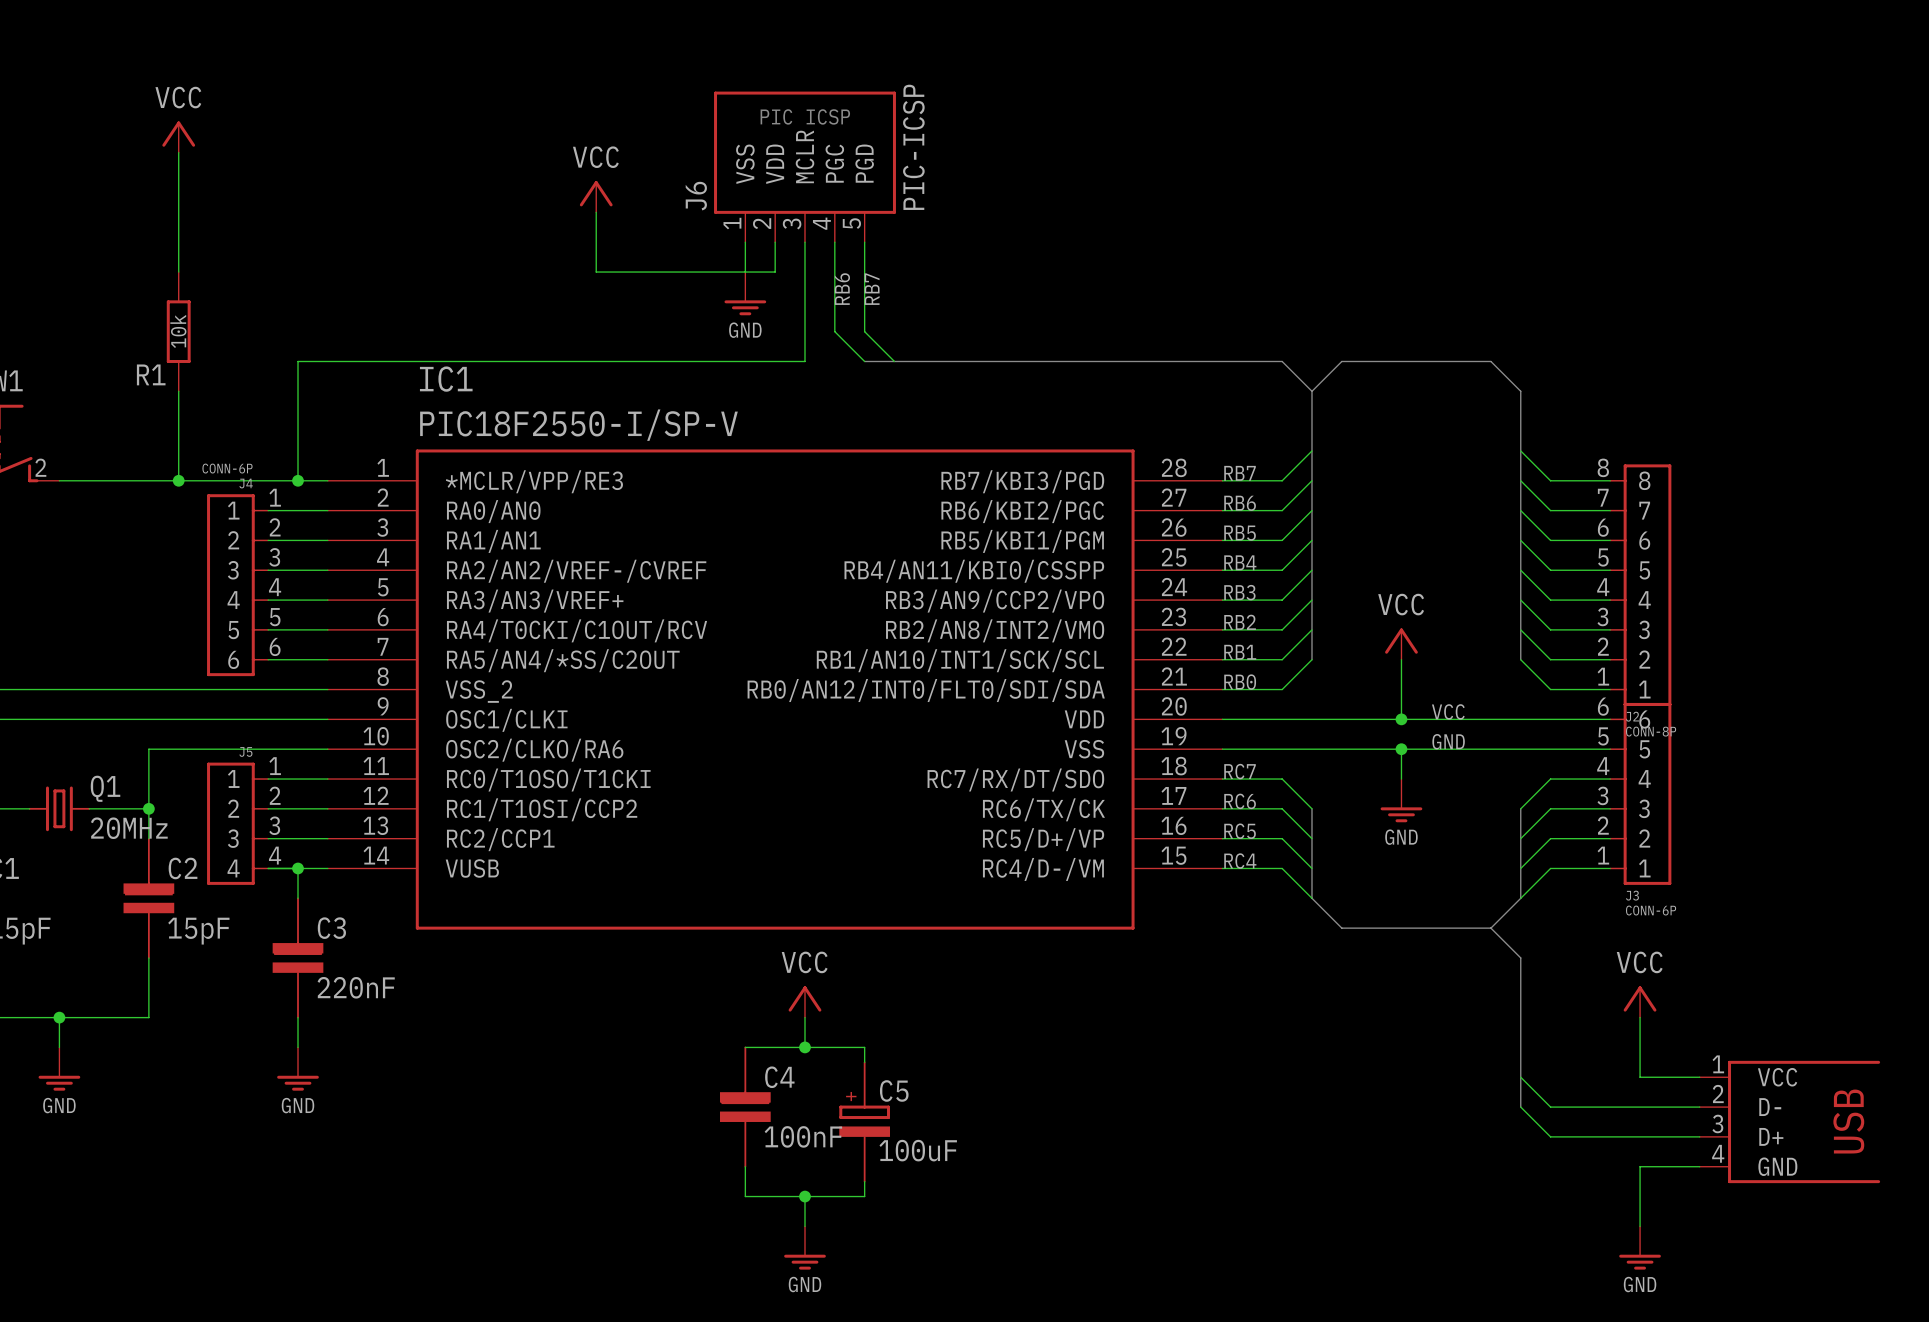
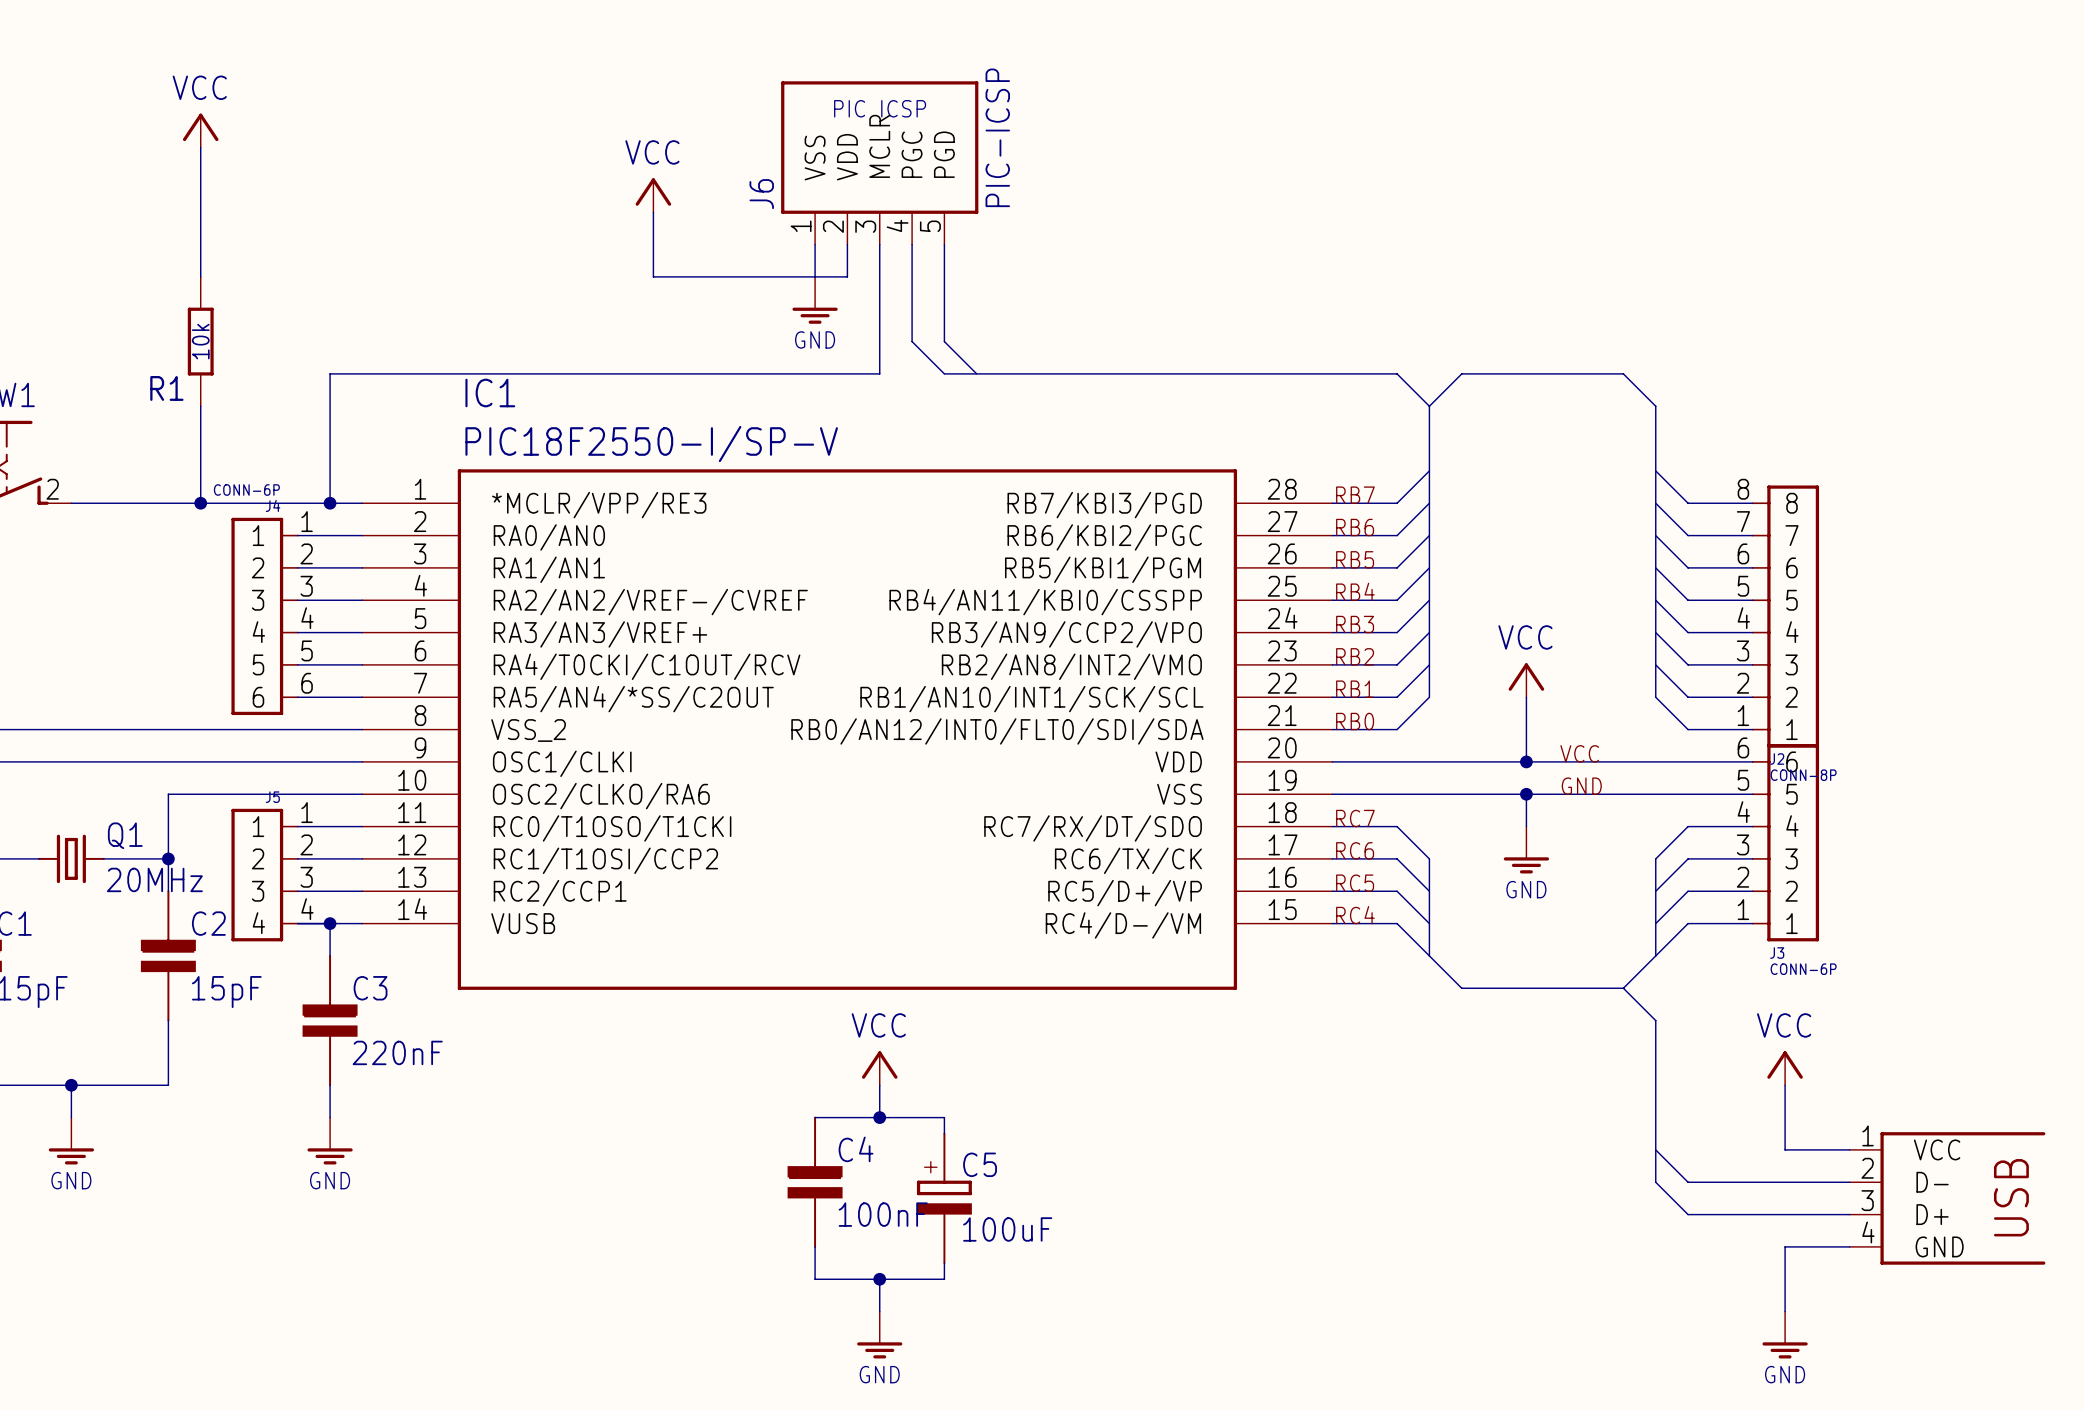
label: RB6 (842, 289) -> none
label: RB7 (872, 289) -> none

